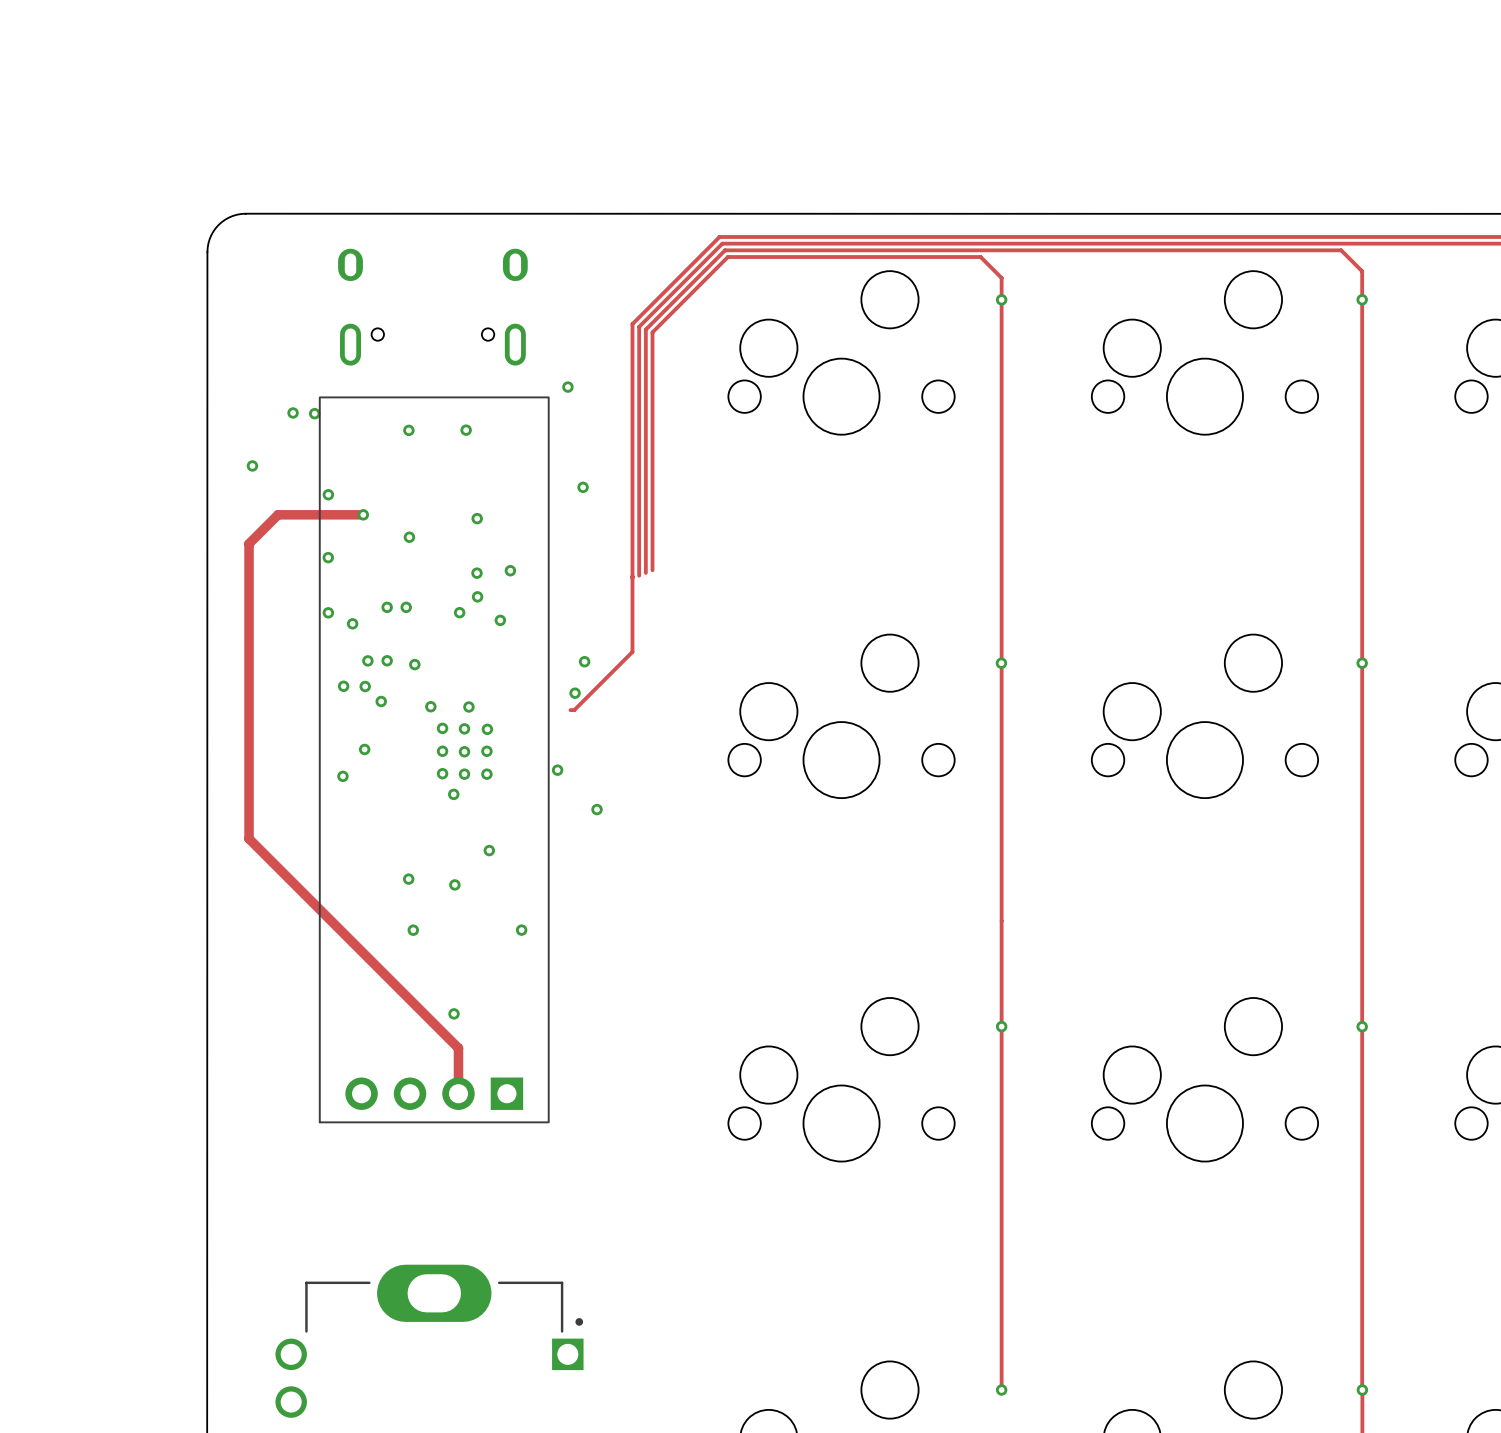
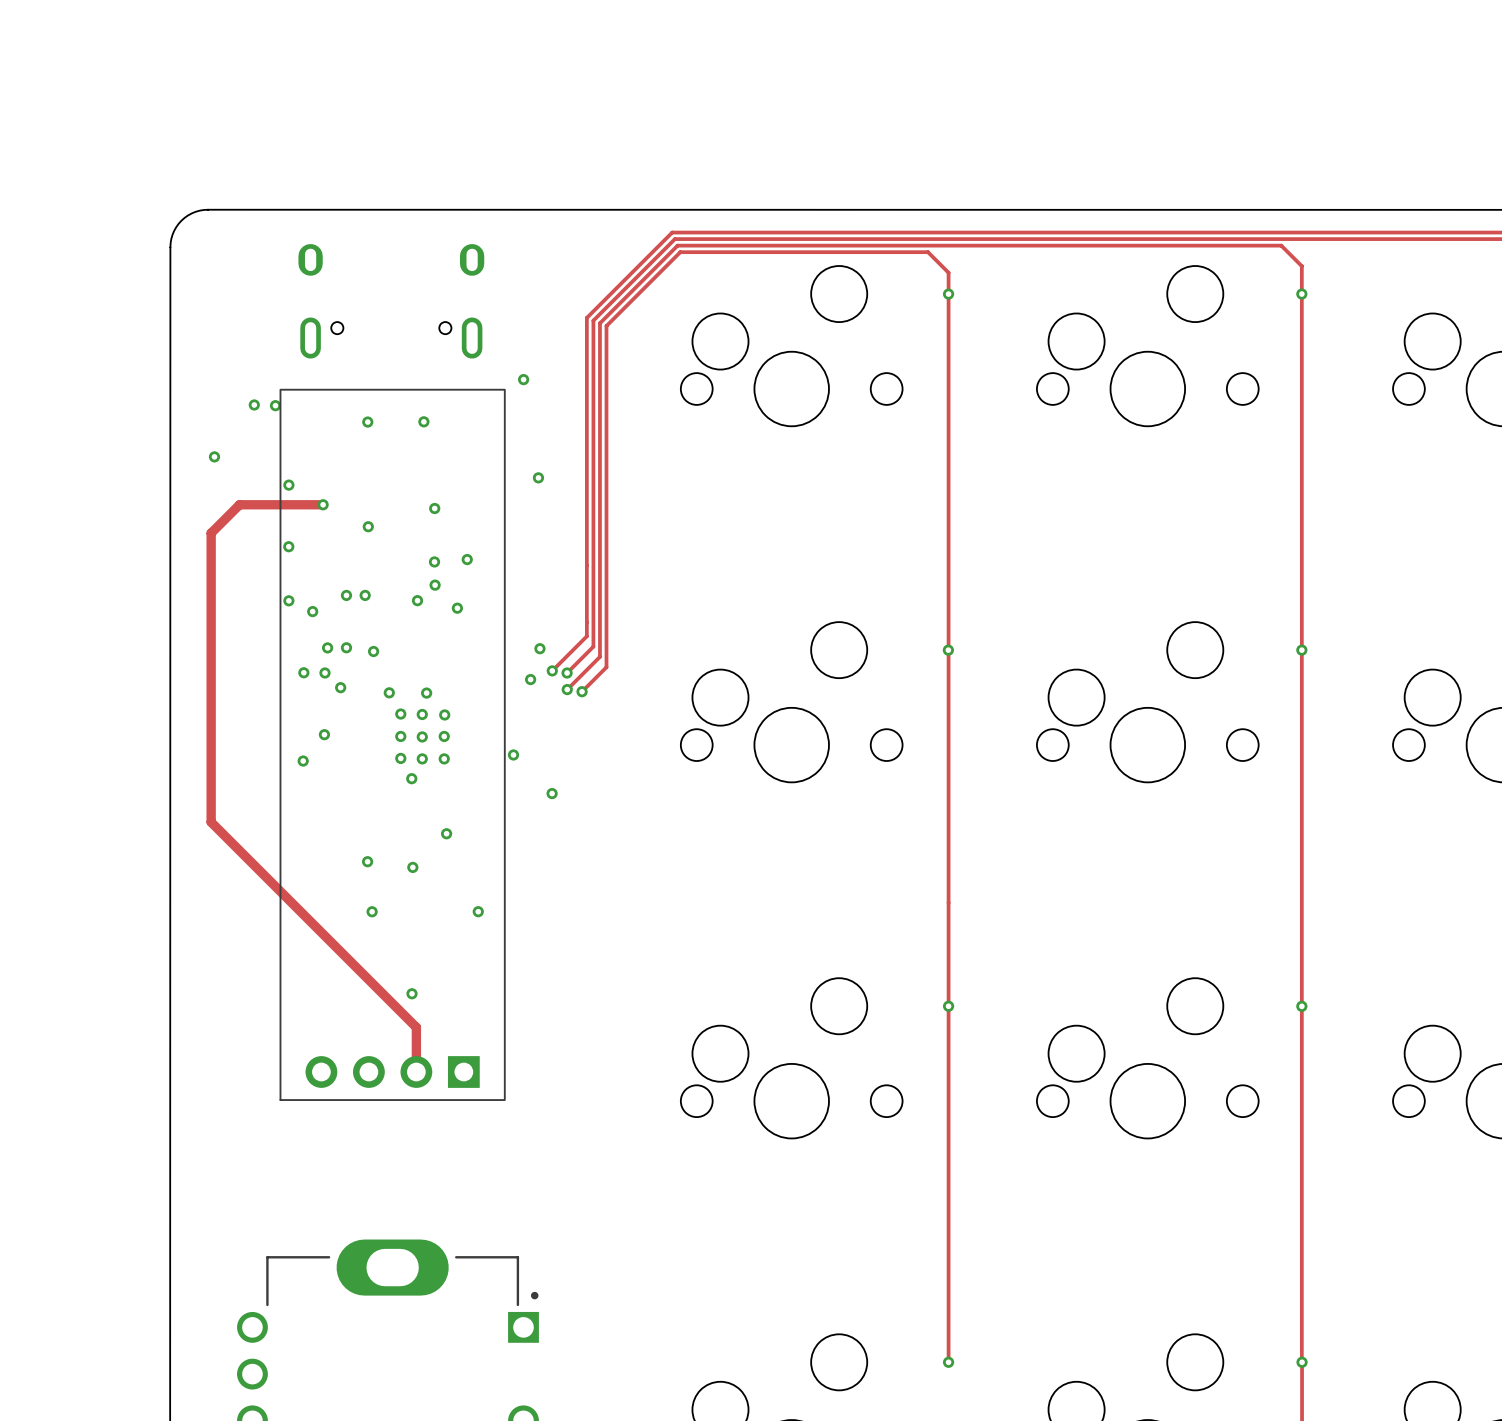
track: none -> (606, 559) (606, 667) (582, 691)
track: none -> (599, 561) (599, 656) (567, 689)
track: none -> (593, 564) (593, 646) (567, 673)
track: (632, 649) (632, 651) (574, 710) (570, 710) -> (586, 636) (552, 670)
via: none -> (552, 670)
via: none -> (567, 673)
via: none -> (567, 689)
via: none -> (582, 691)

